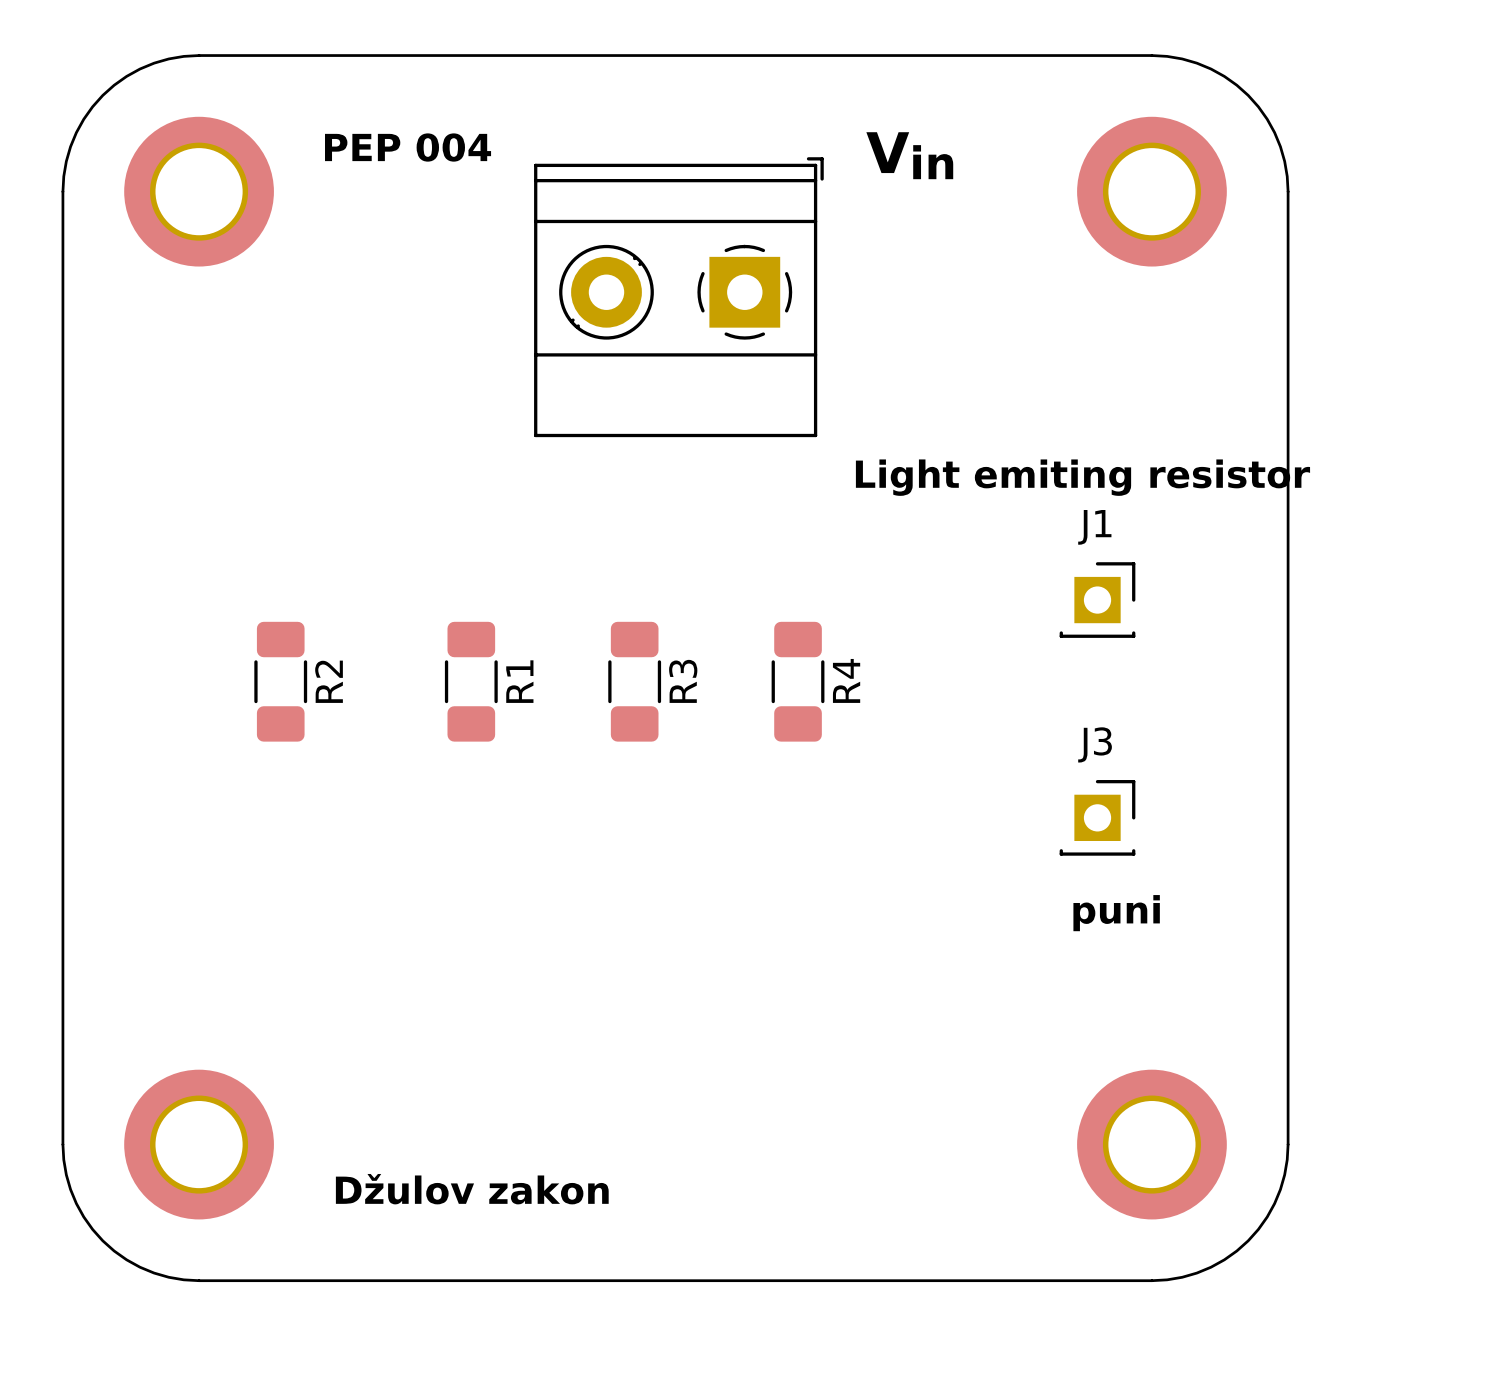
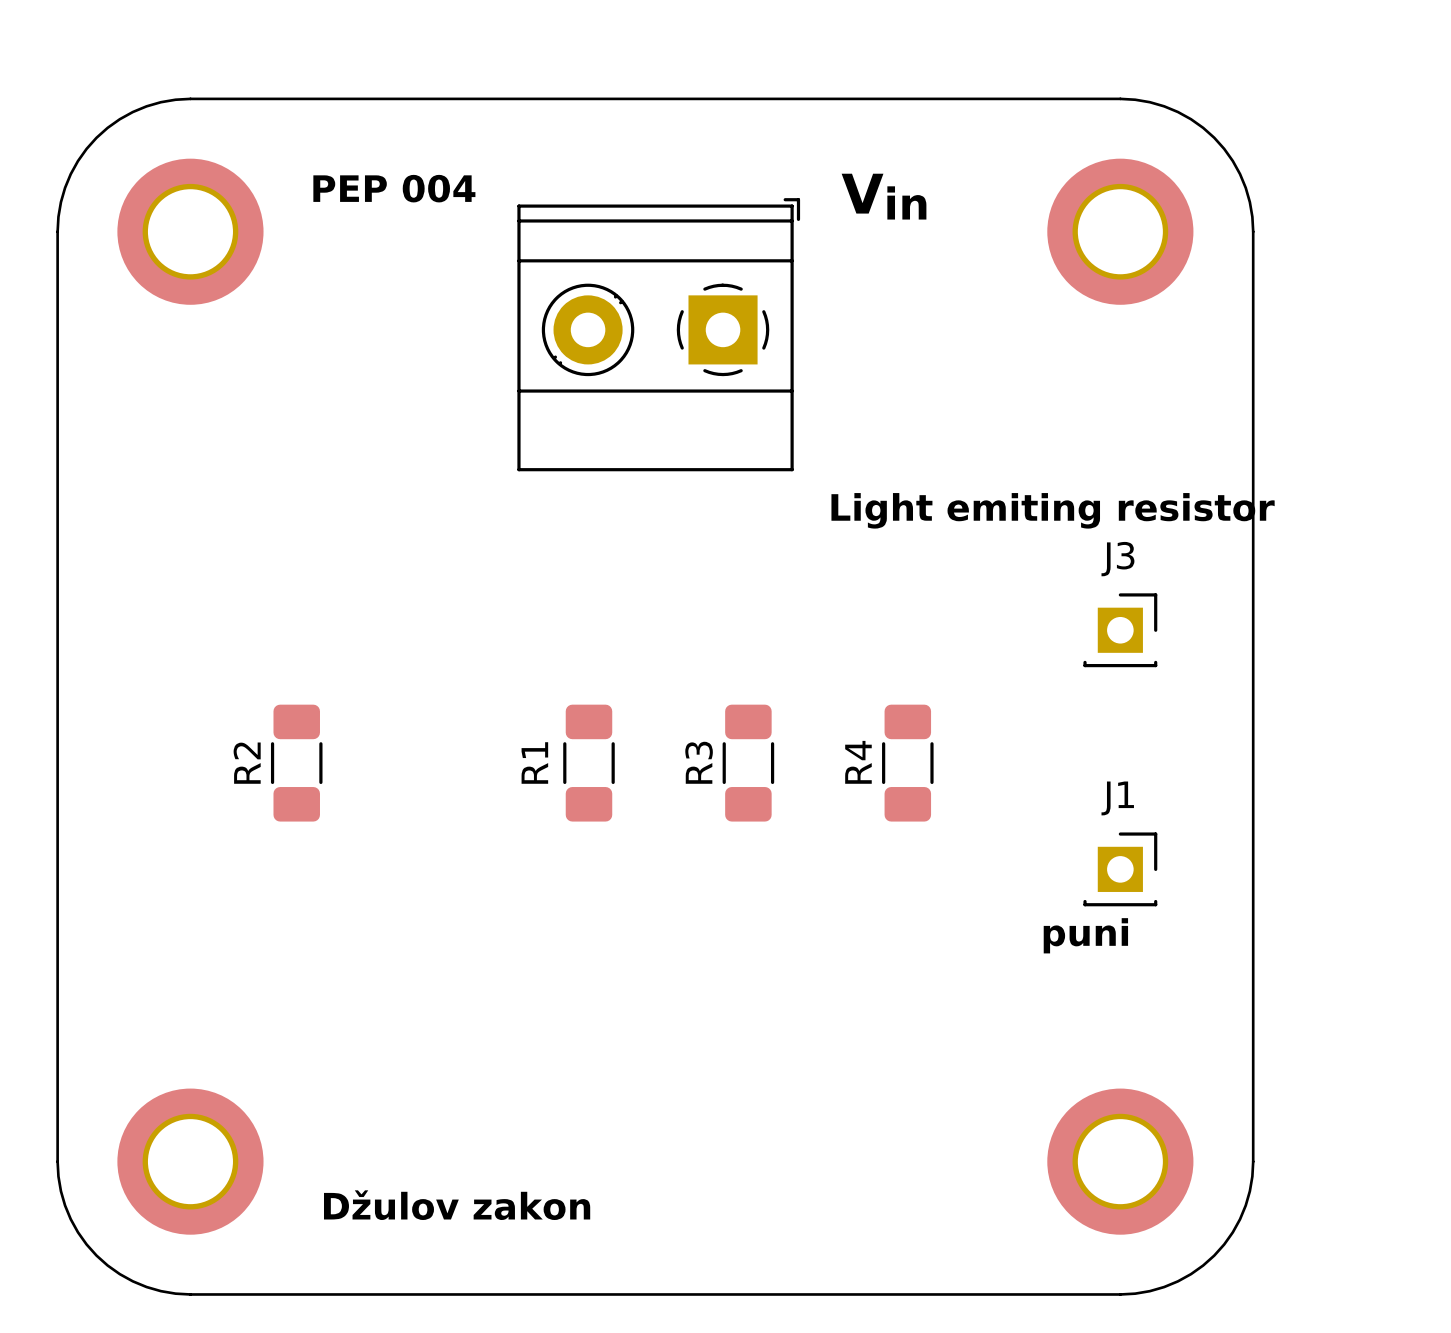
J1 position: (1097, 600) -> (1120, 869)
R4 name position: R4 (846, 680) -> R4 (858, 762)
R2 position: (280, 681) -> (296, 763)
R2 name position: R2 (329, 681) -> R2 (247, 763)
R1 position: (471, 681) -> (588, 763)
R1 name position: R1 (519, 681) -> R1 (534, 763)
R3 position: (634, 681) -> (748, 763)
R3 name position: R3 (683, 681) -> R3 (699, 762)
R4 position: (798, 681) -> (907, 763)
J3 position: (1097, 817) -> (1120, 630)

